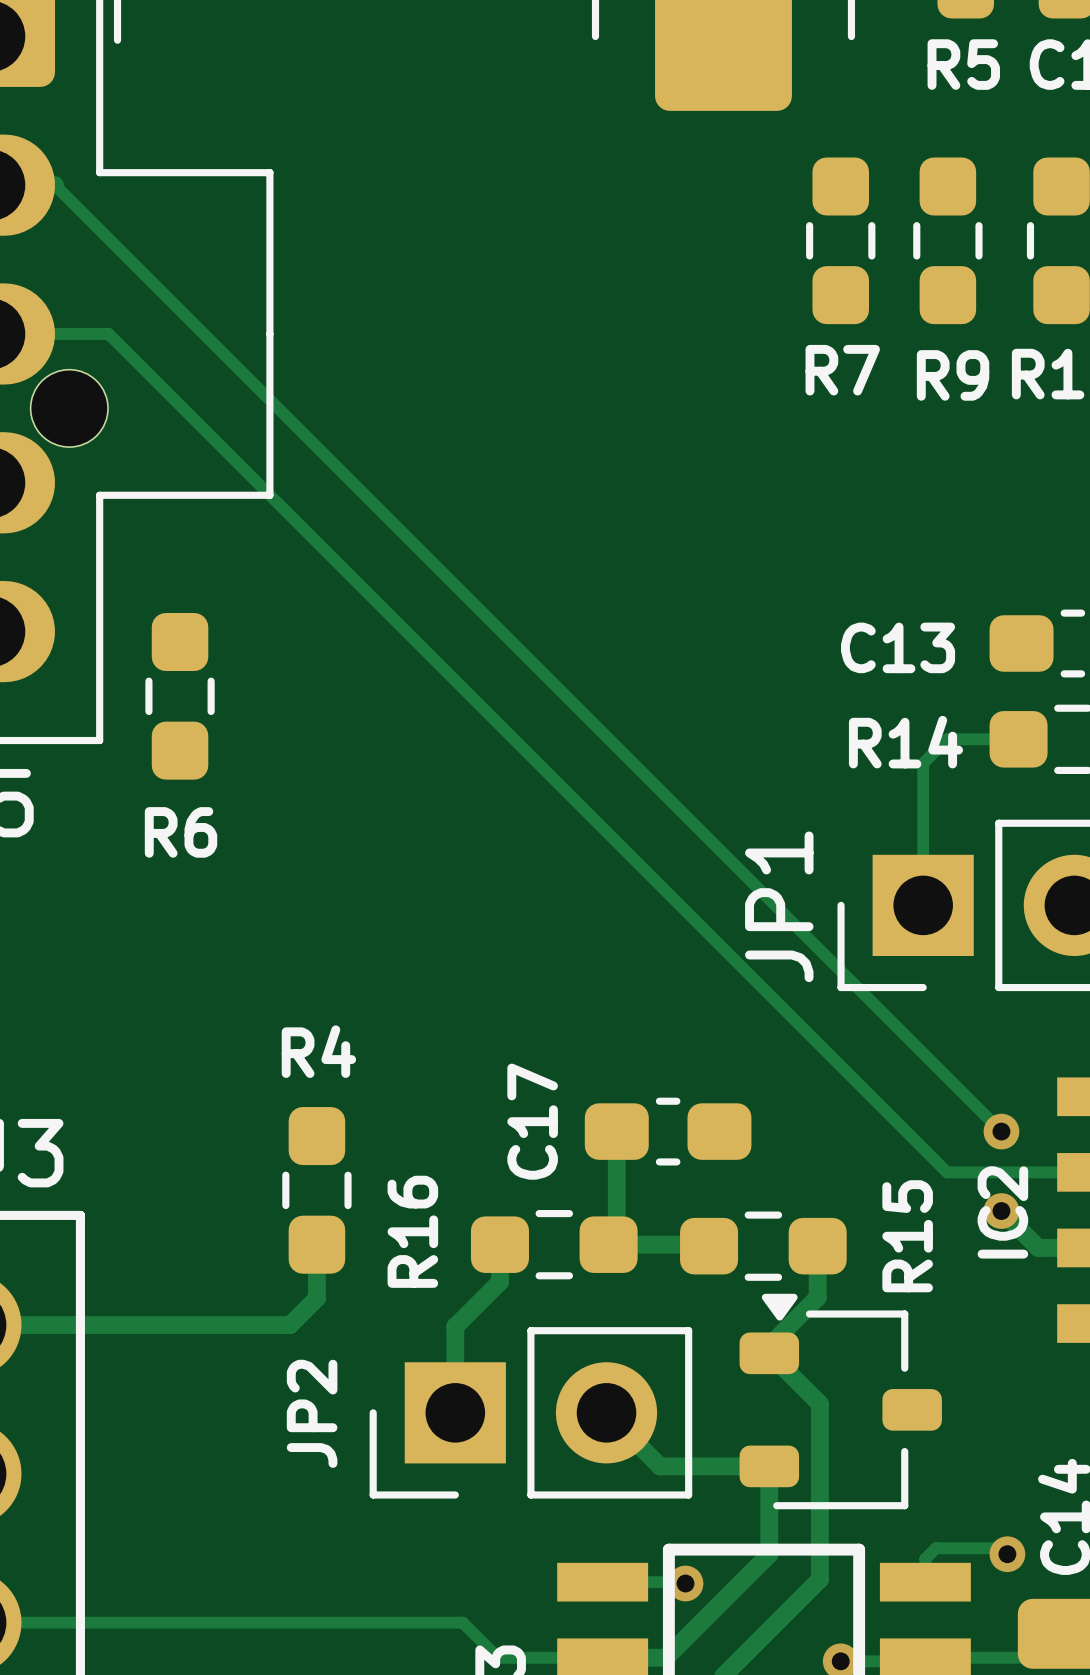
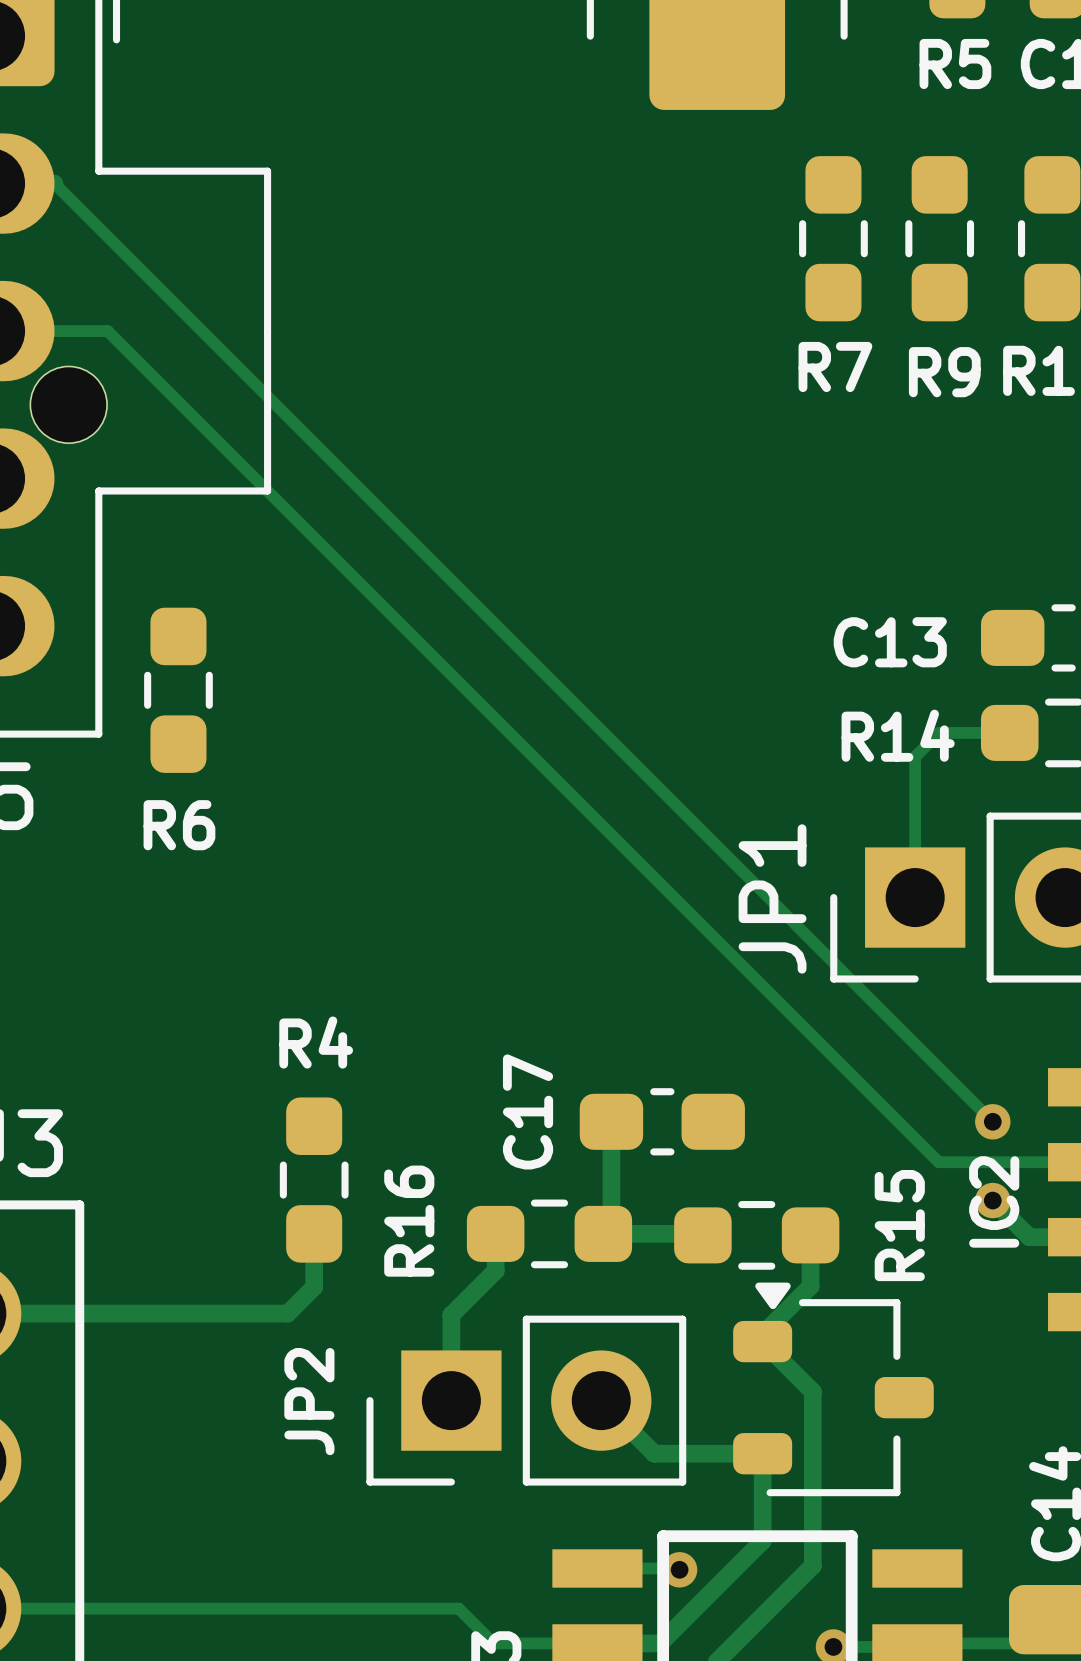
track: (1007, 1554) (1001, 1548) (935, 1548) (925, 1558) (925, 1582) -> none
via: (1007, 1554) -> none

